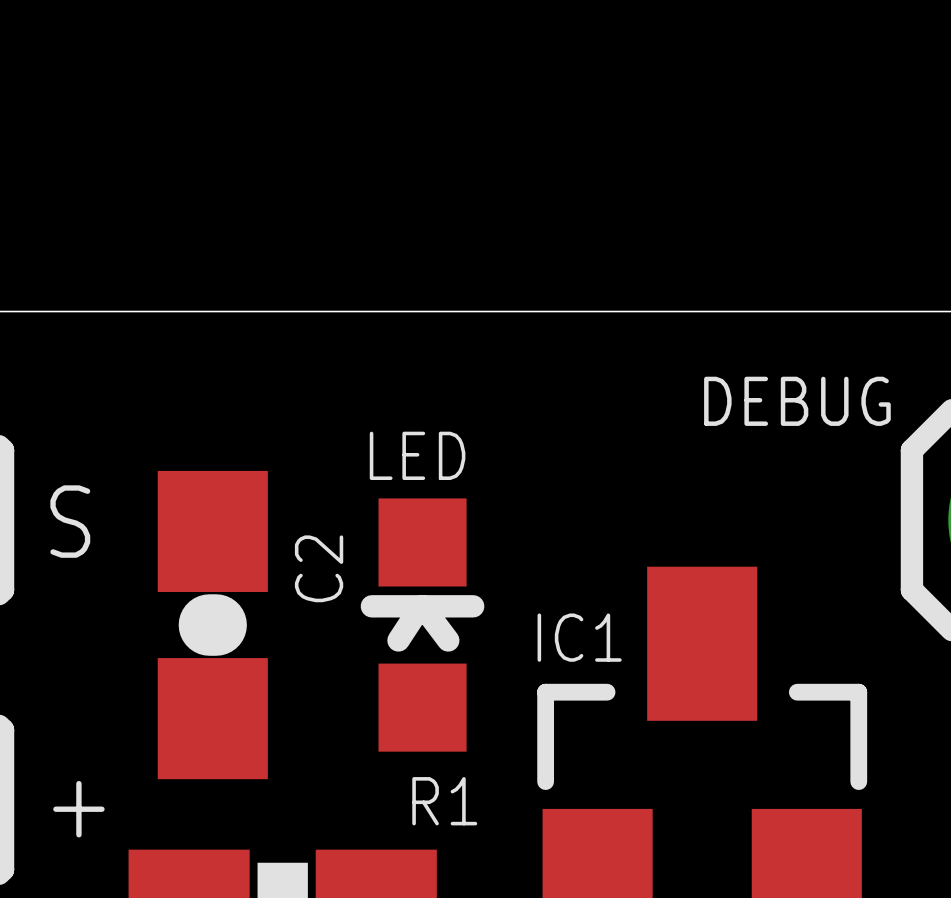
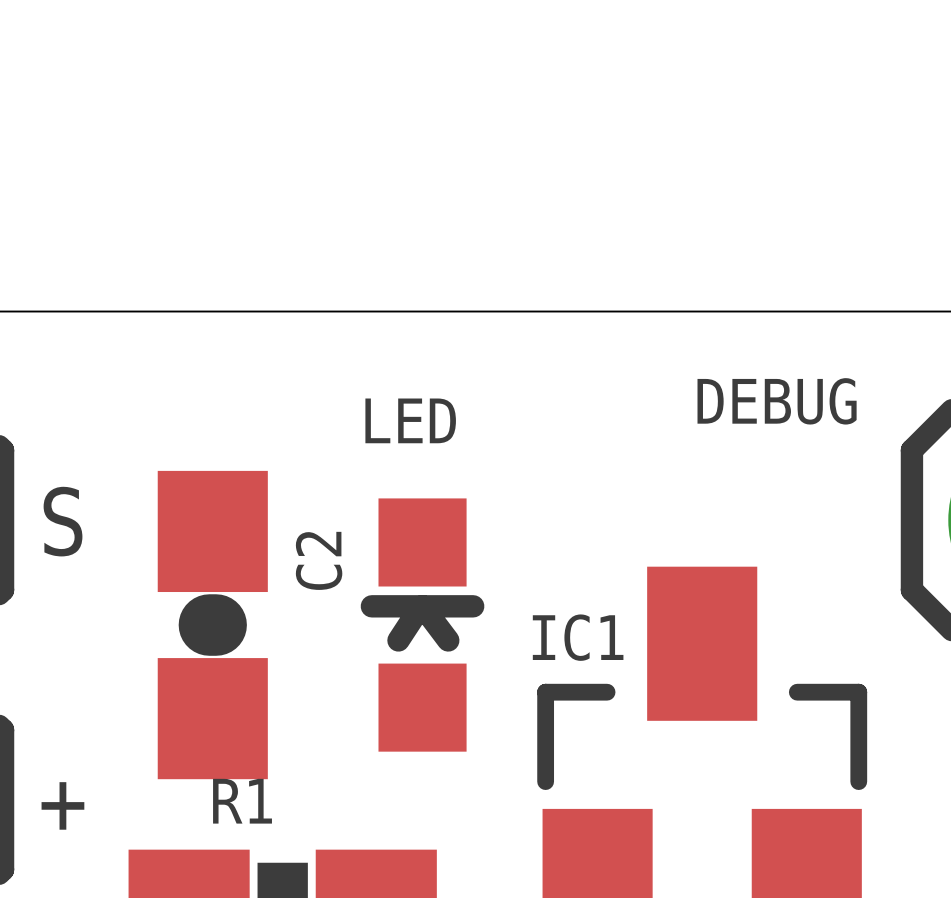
LED name position: LED (417, 455) -> LED (410, 420)
R1 name position: R1 (444, 801) -> R1 (242, 801)

